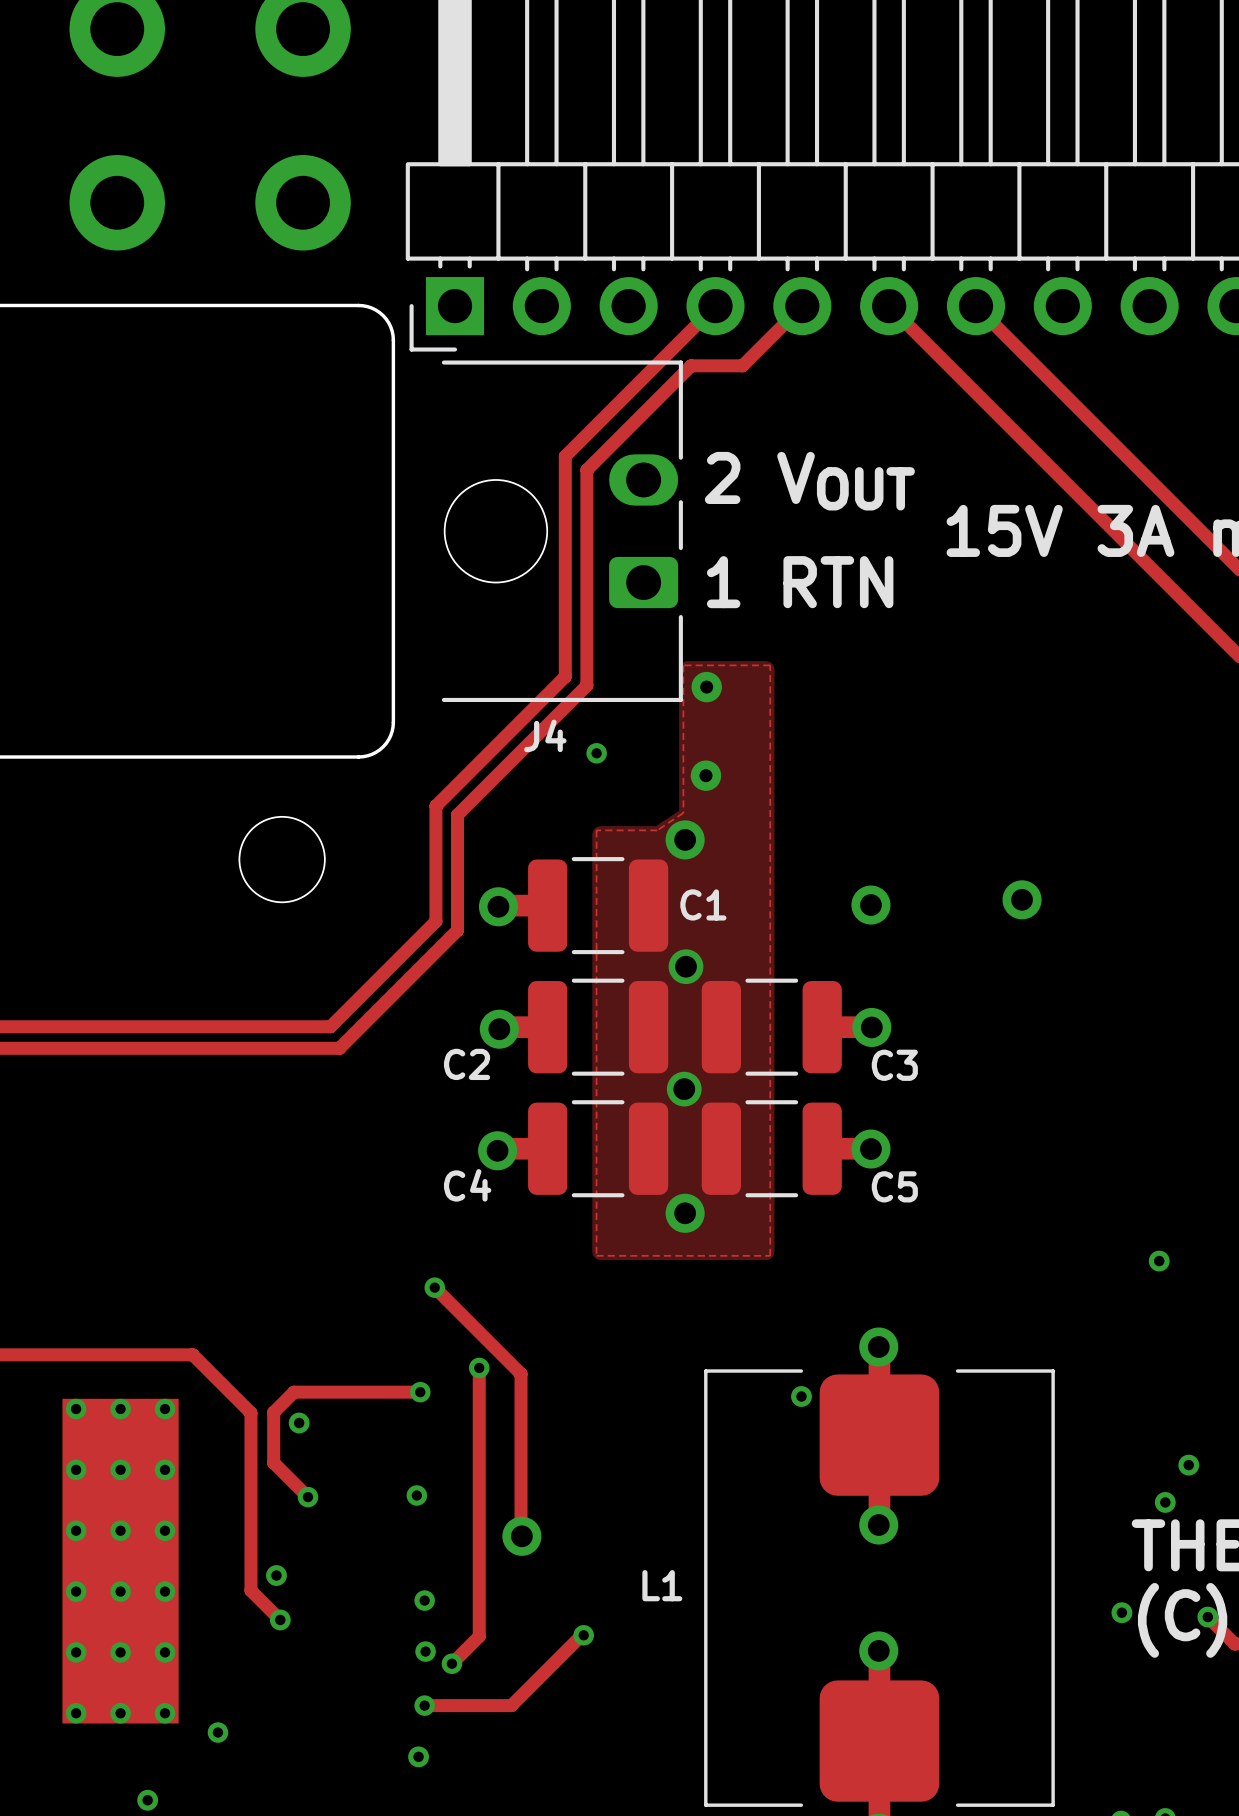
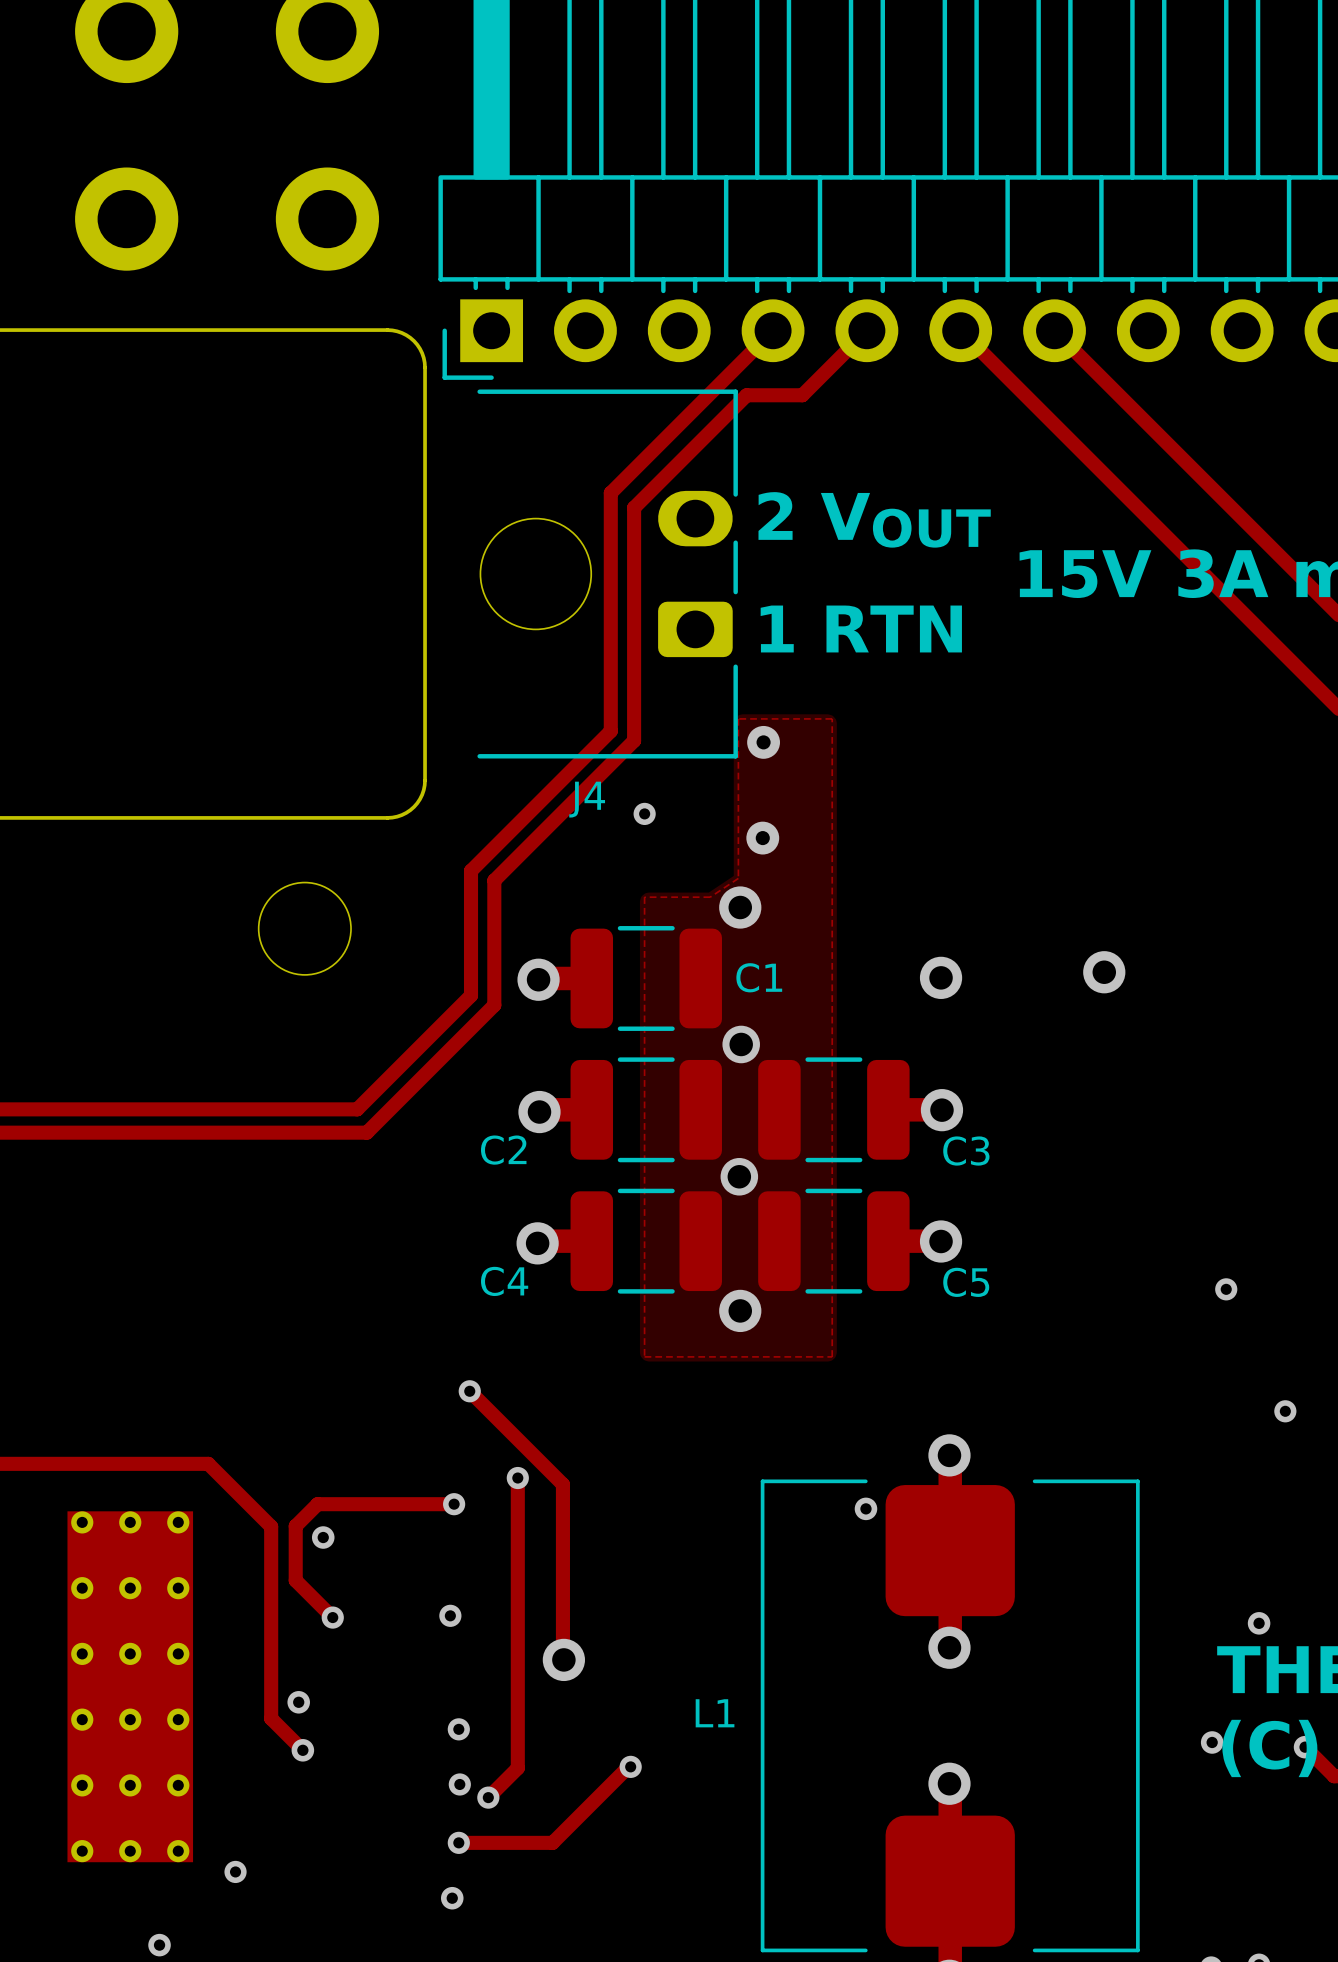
via: none -> (1226, 1289)
via: (1159, 1261) -> none
via: none -> (1285, 1411)
via: (1188, 1465) -> none

